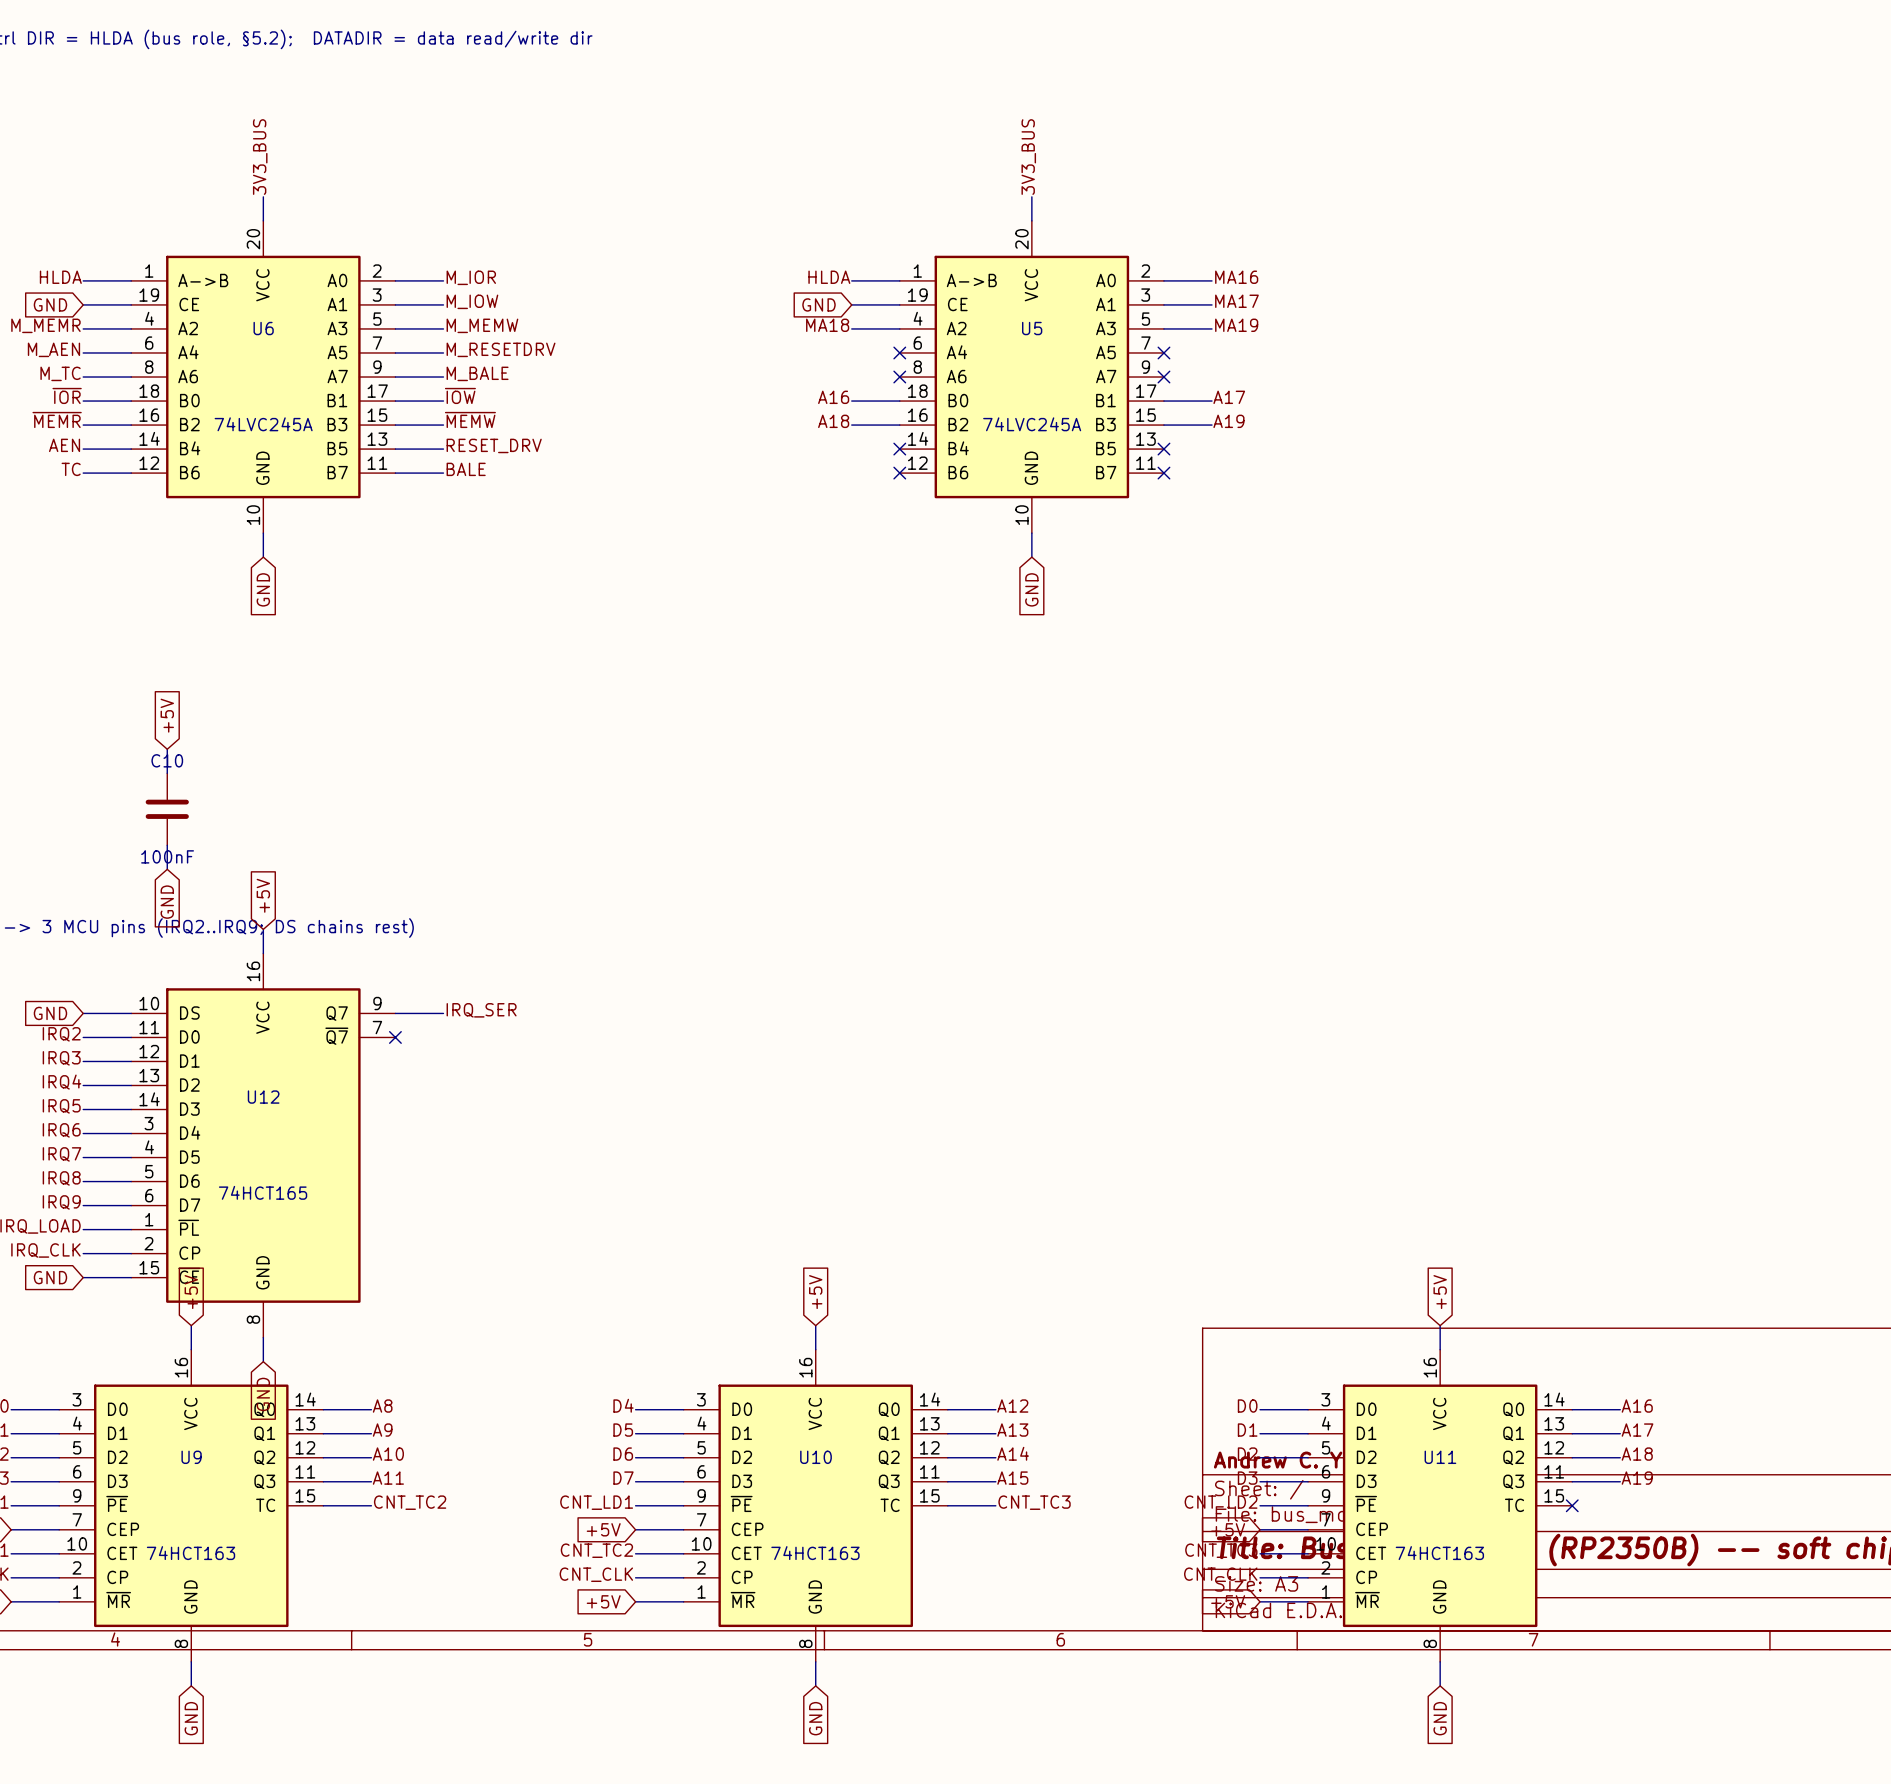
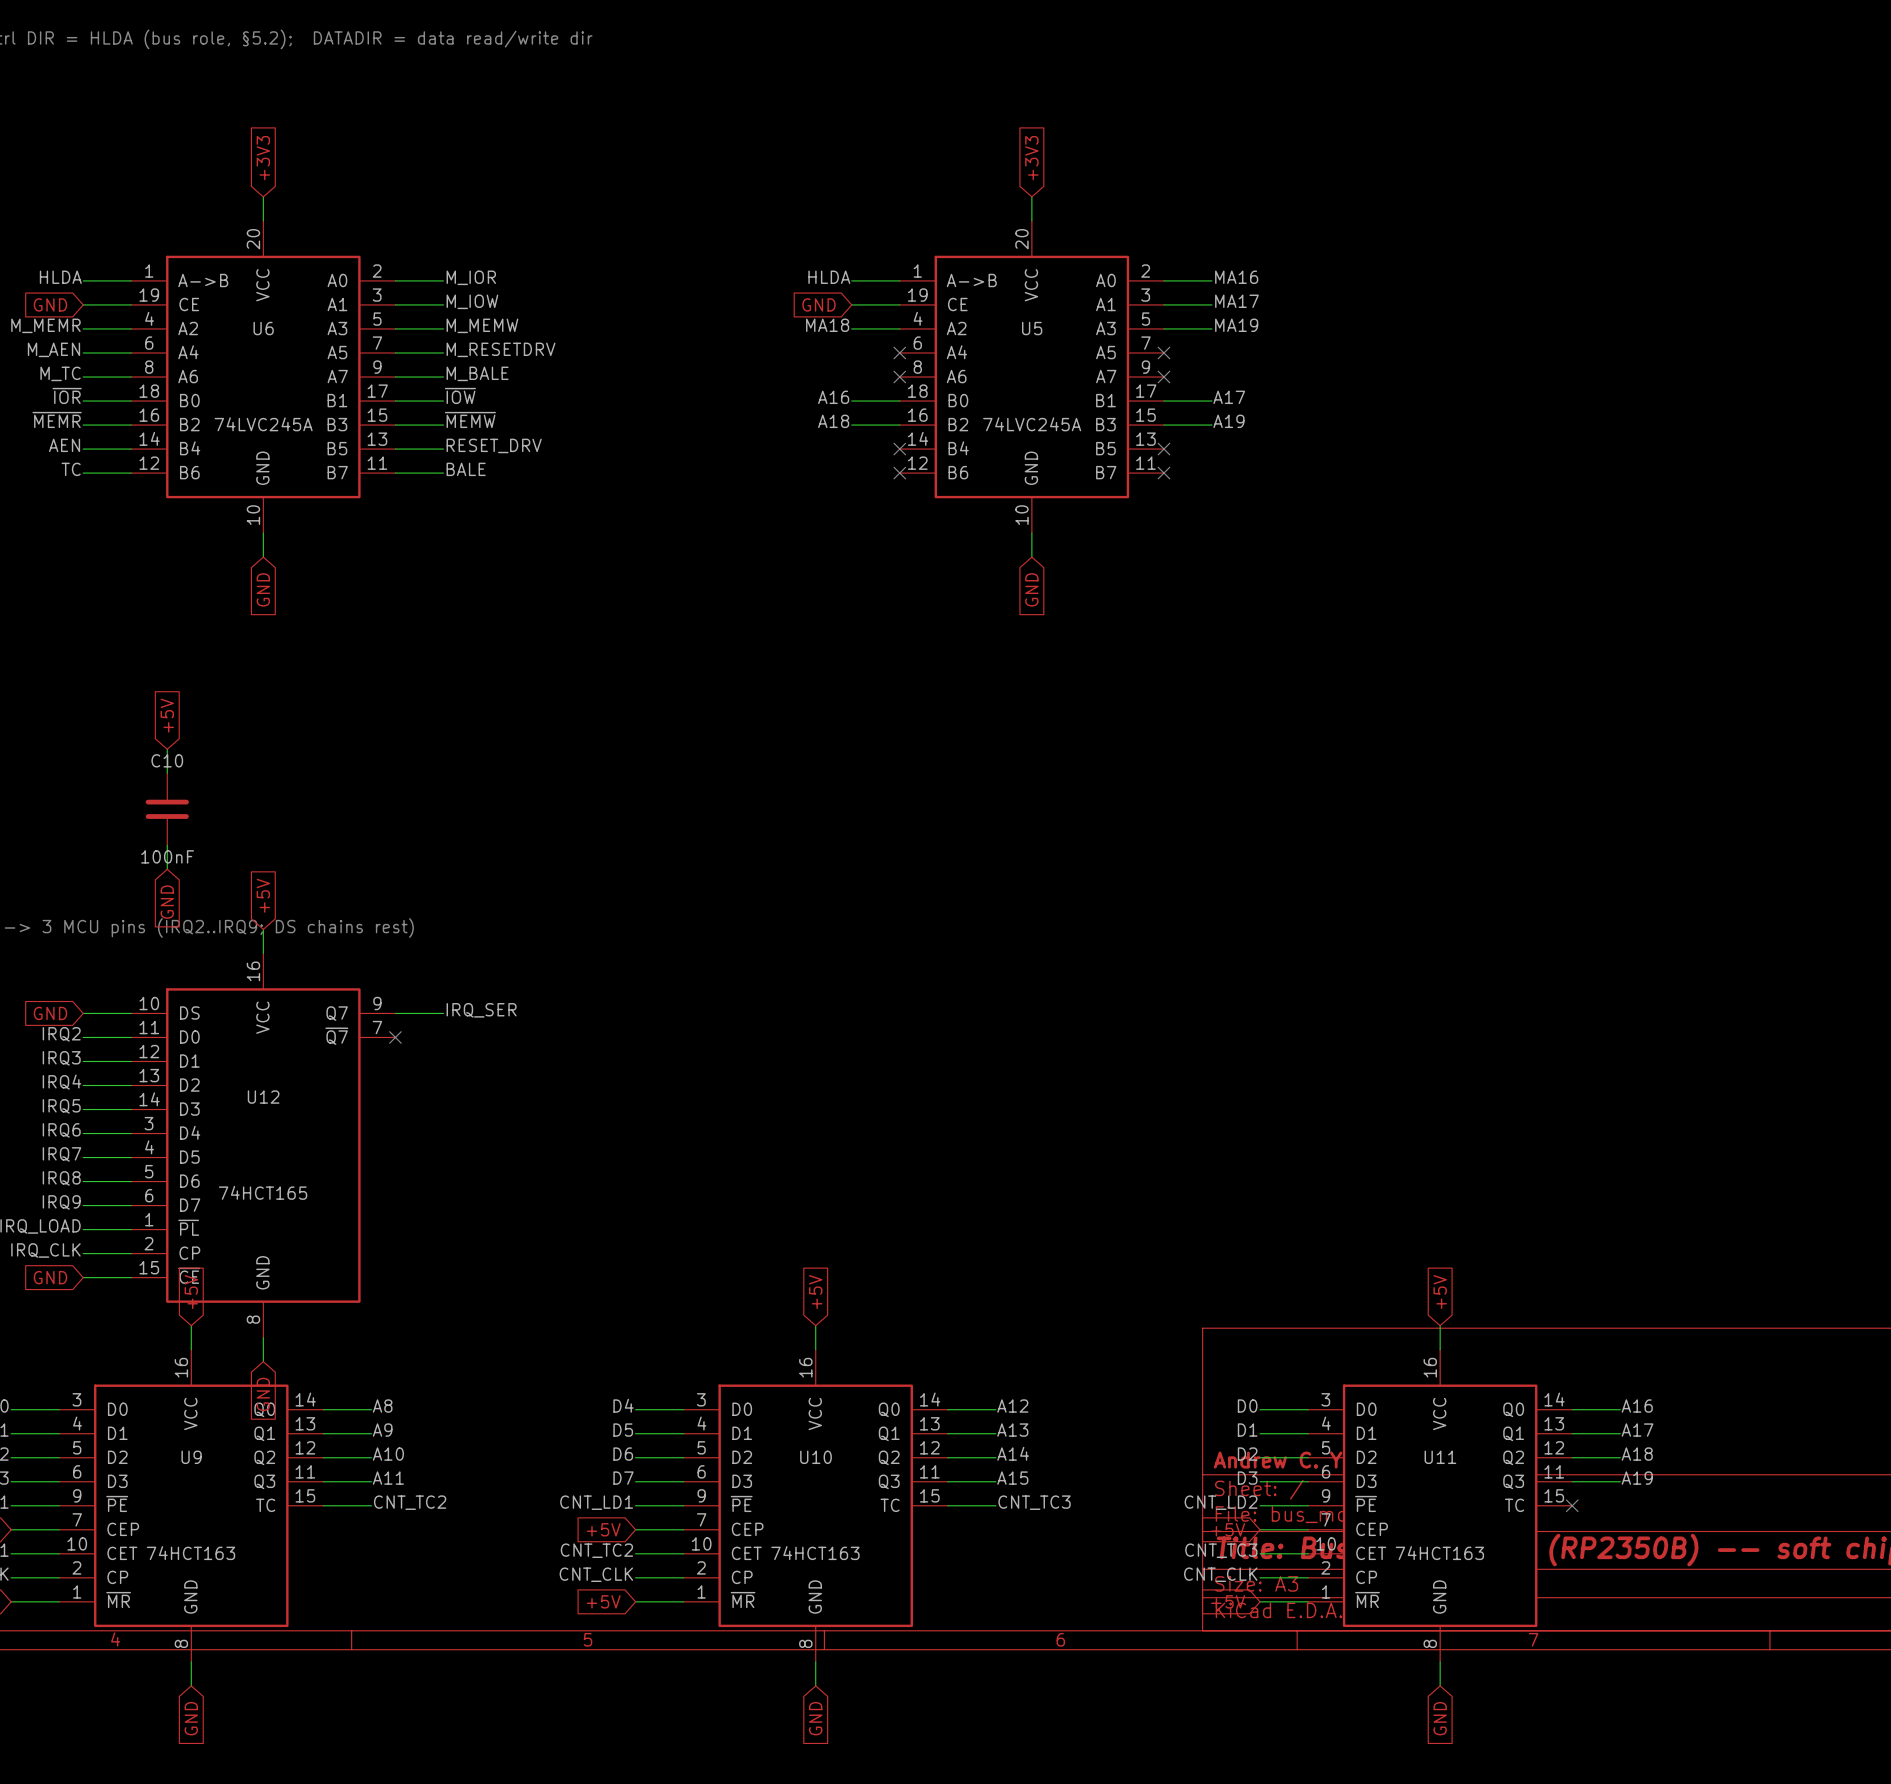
label: 3V3_BUS (260, 157) -> none
label: 3V3_BUS (1028, 157) -> none
global label: none -> +3V3 (263, 158)
global label: none -> +3V3 (1031, 158)

